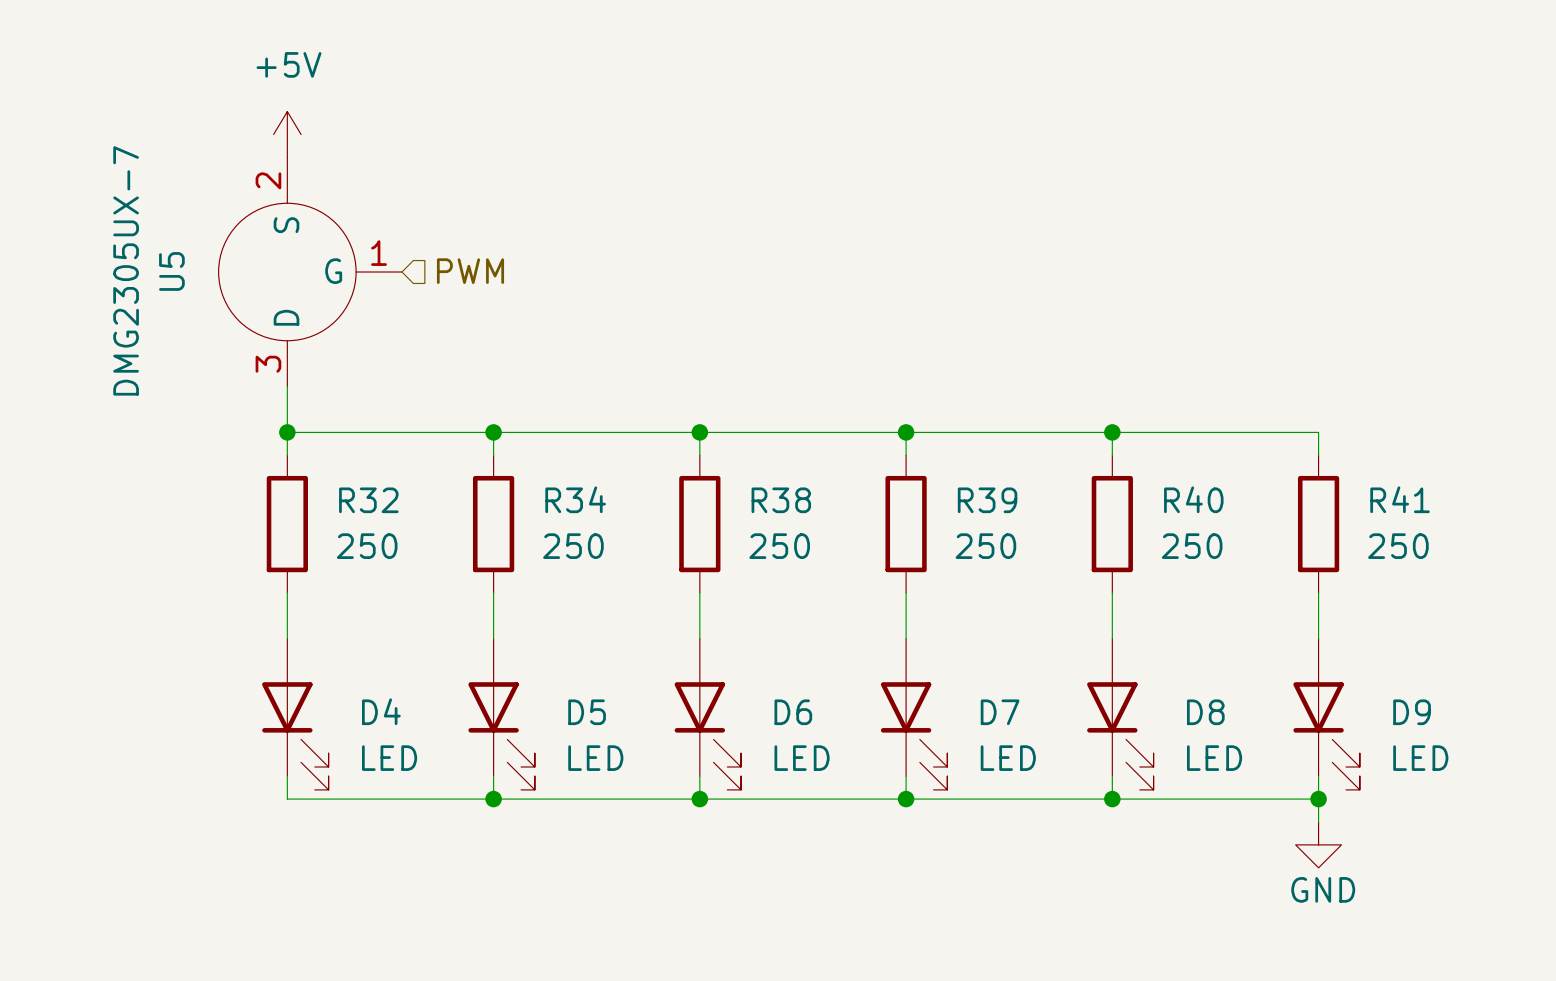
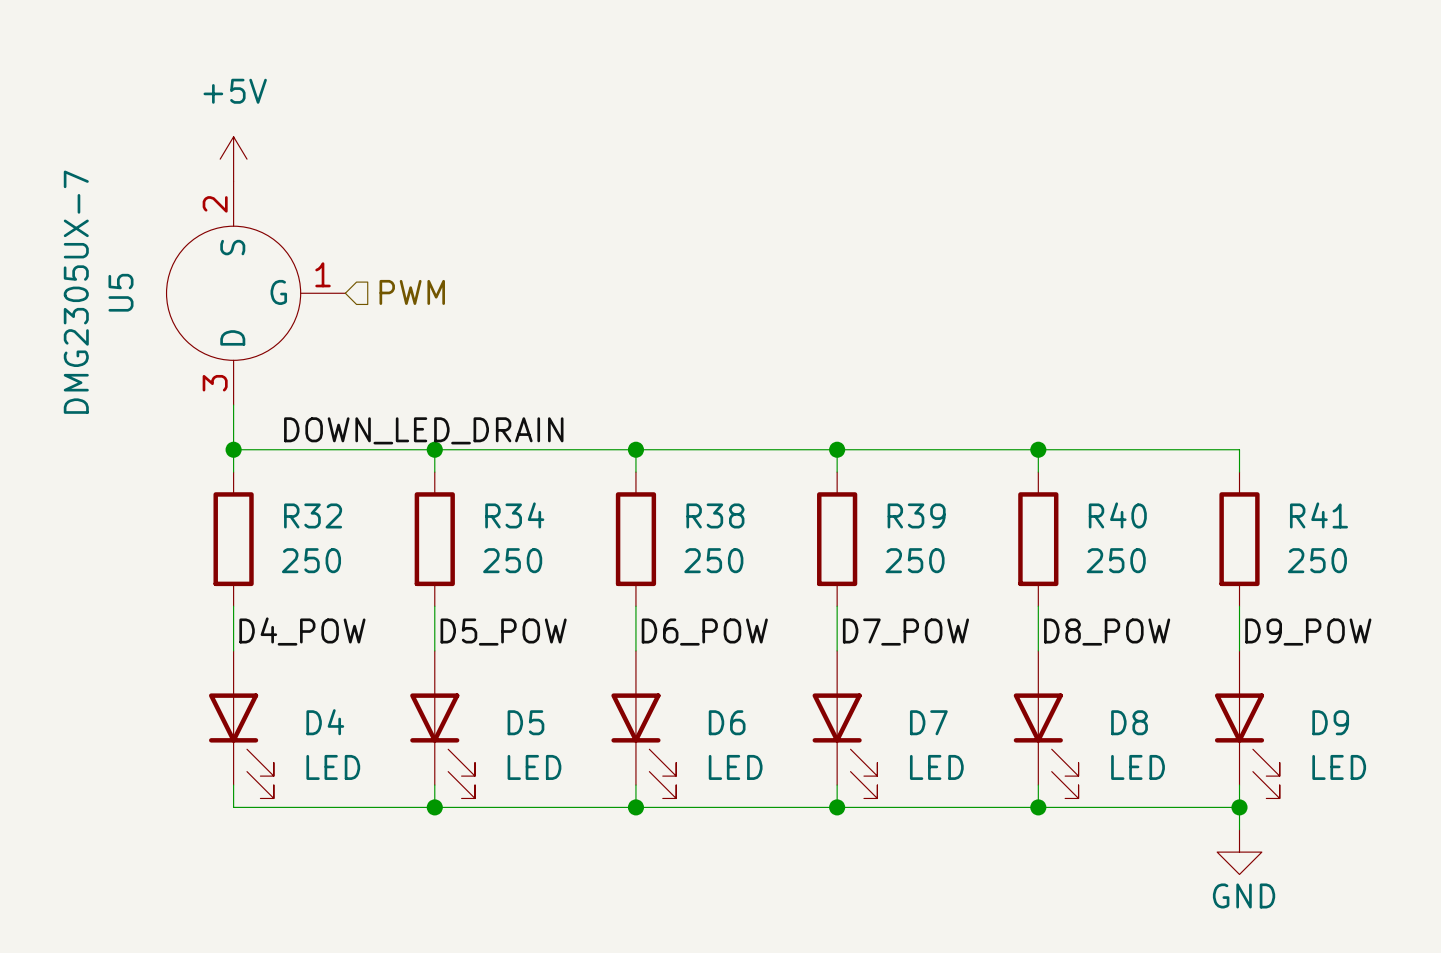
label: none -> DOWN_LED_DRAIN (423, 430)
label: none -> D4_POW (302, 631)
label: none -> D5_POW (503, 632)
label: none -> D6_POW (704, 632)
label: none -> D7_POW (905, 632)
label: none -> D8_POW (1107, 632)
label: none -> D9_POW (1308, 632)

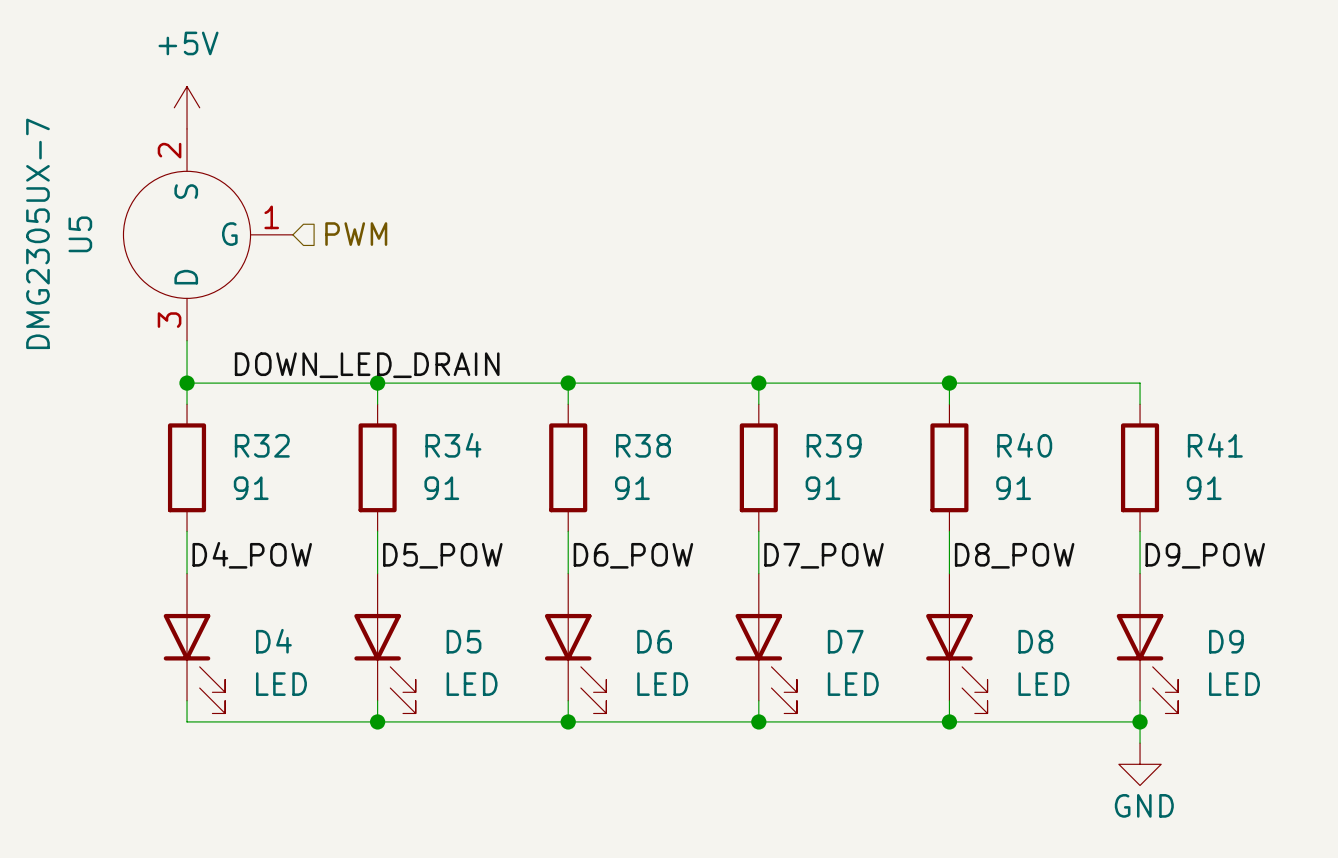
R32 value: 250 (311, 560) -> 91 (251, 488)
R34 value: 250 (512, 560) -> 91 (441, 488)
R38 value: 250 (713, 560) -> 91 (632, 488)
R39 value: 250 (915, 560) -> 91 (823, 488)
R40 value: 250 (1116, 560) -> 91 (1013, 488)
R41 value: 250 (1317, 560) -> 91 (1204, 488)

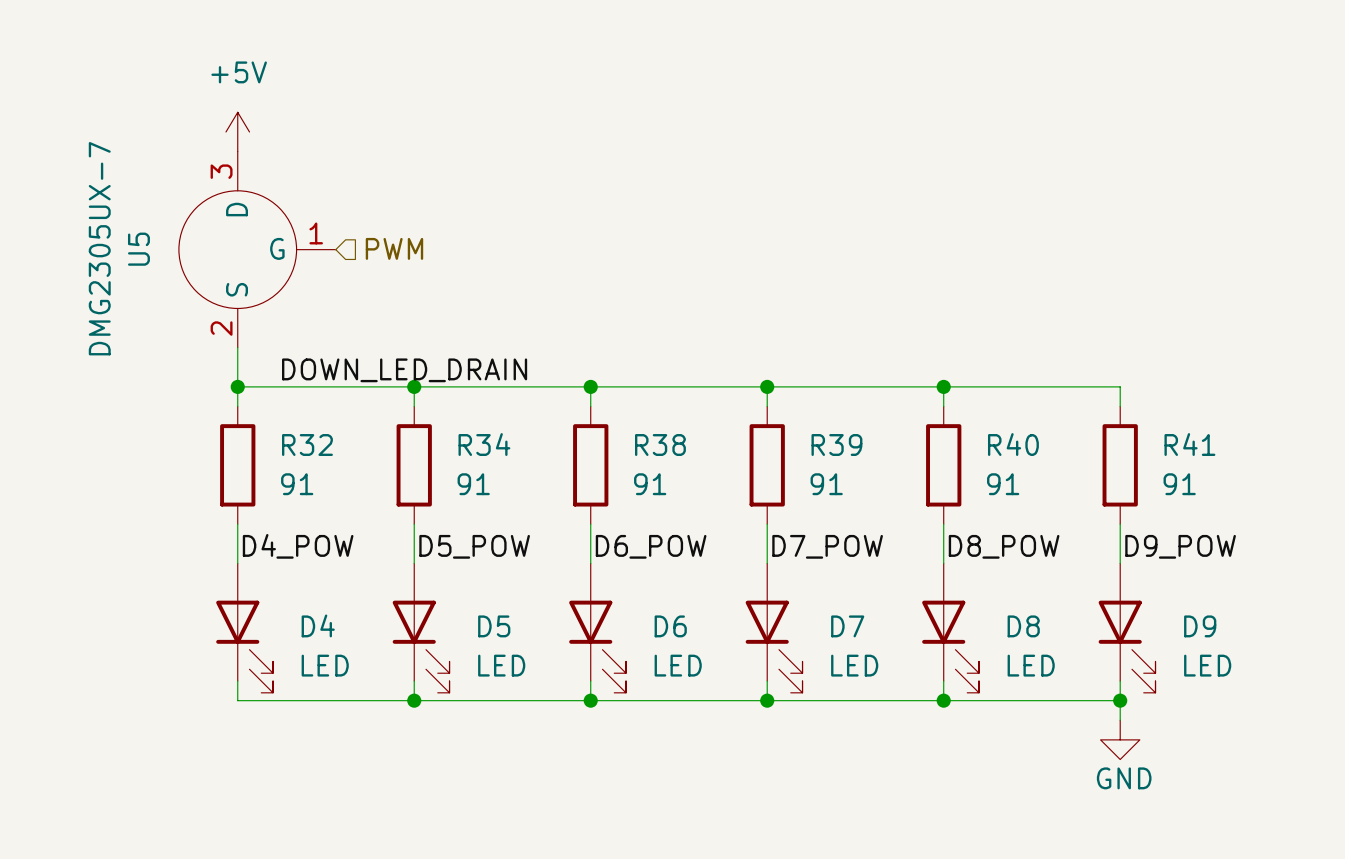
U5 flip: as is (187, 234) -> up-down (237, 249)

